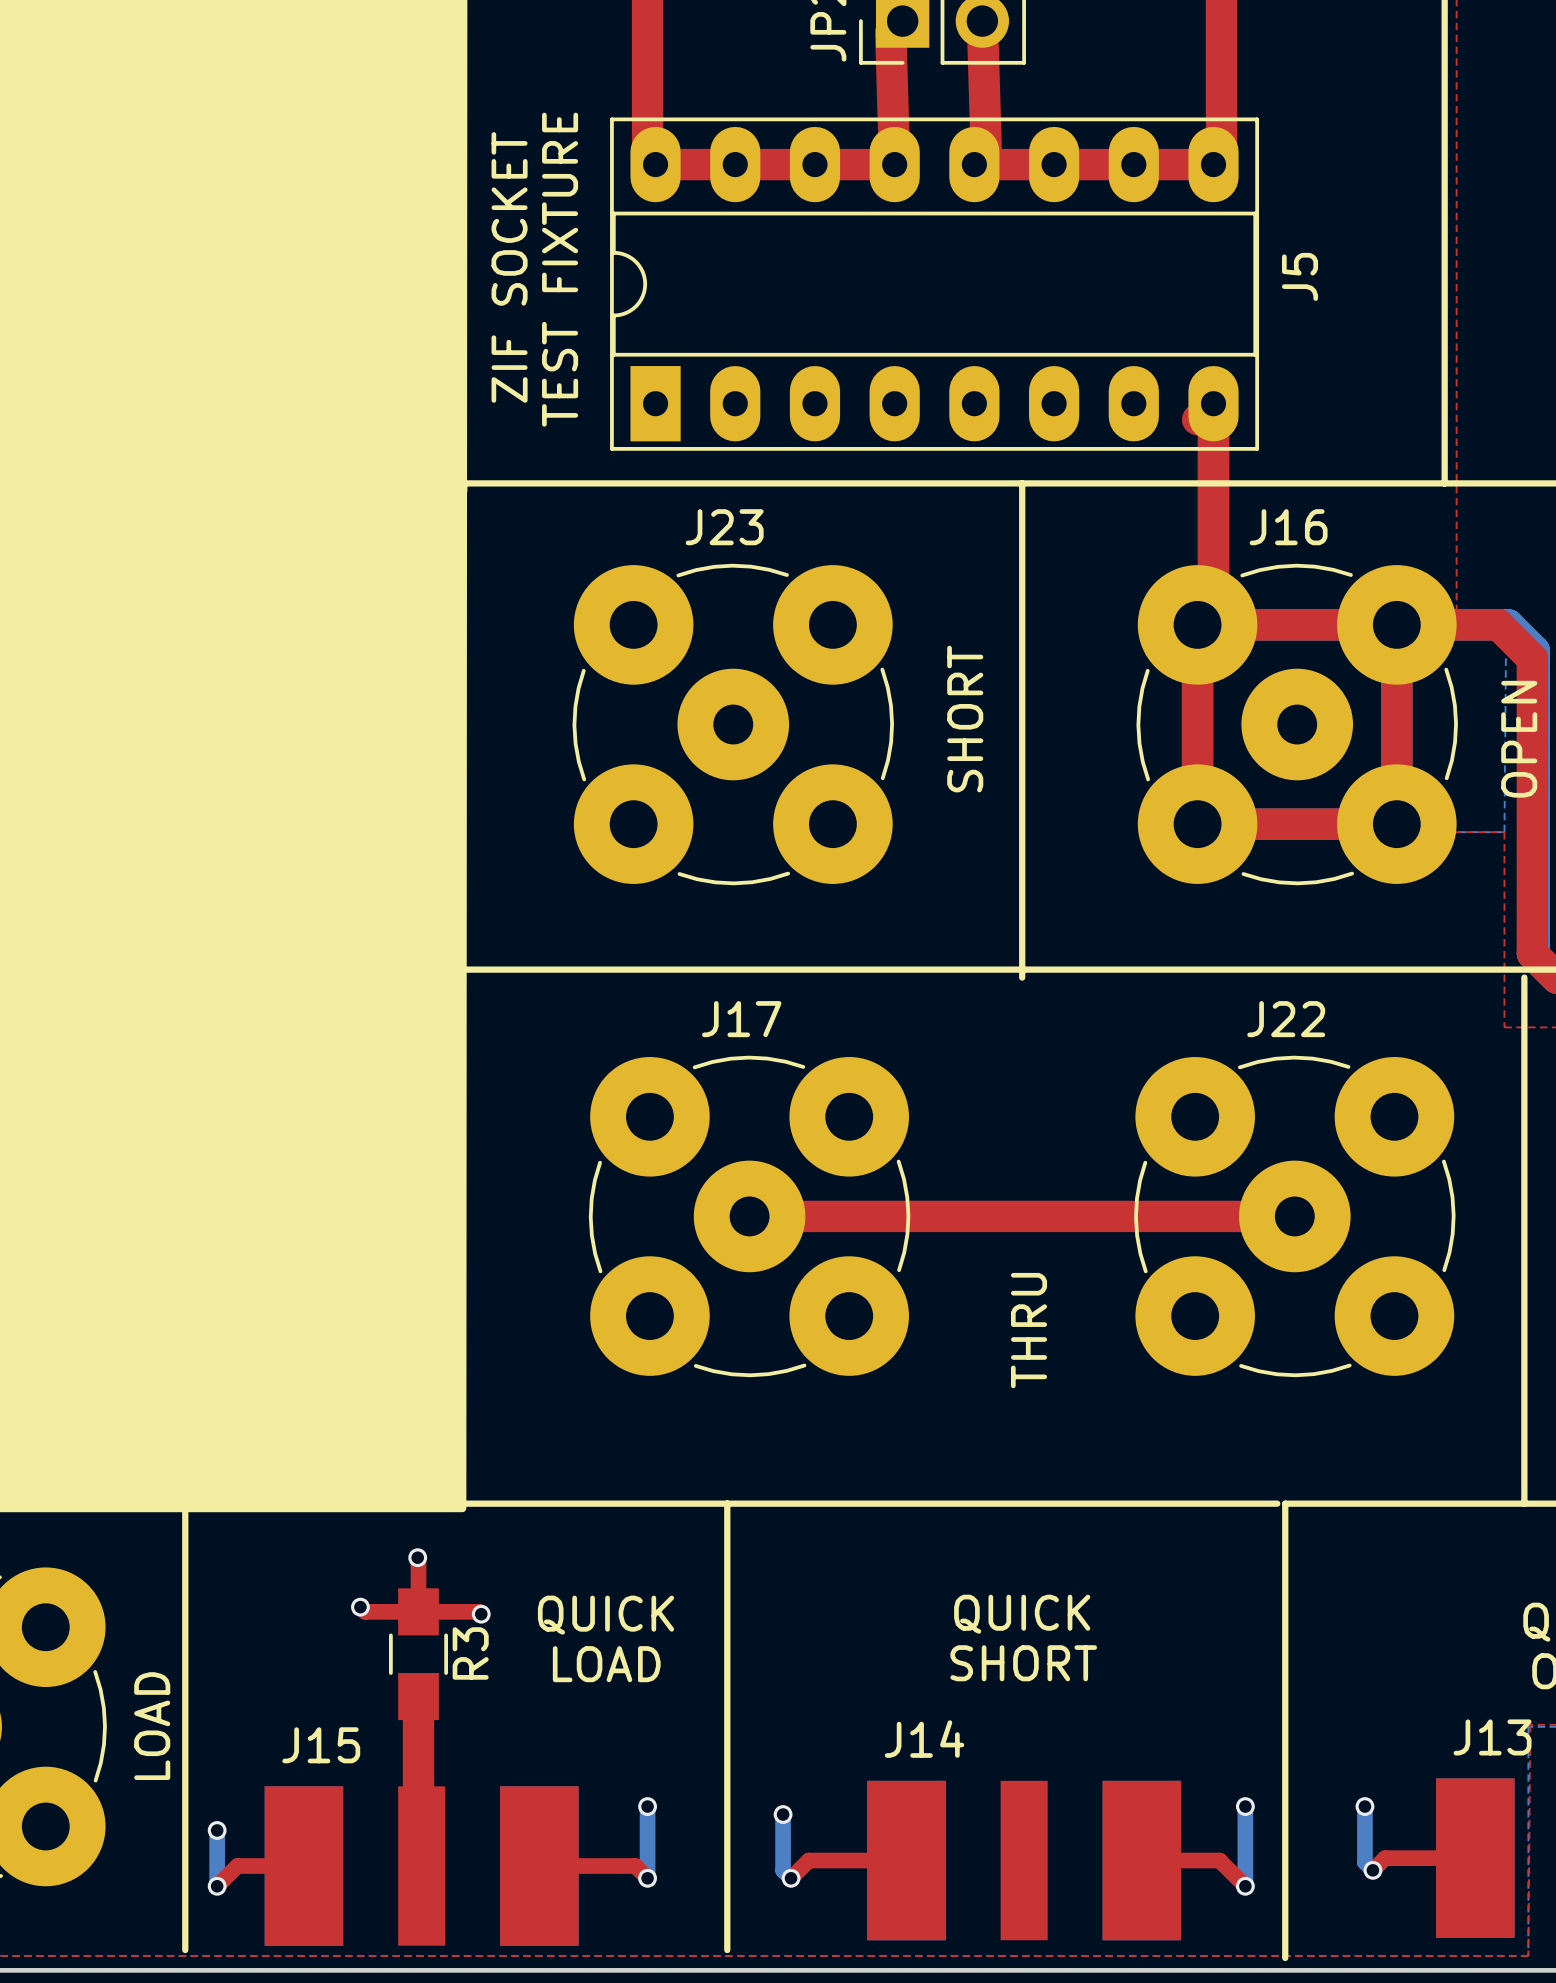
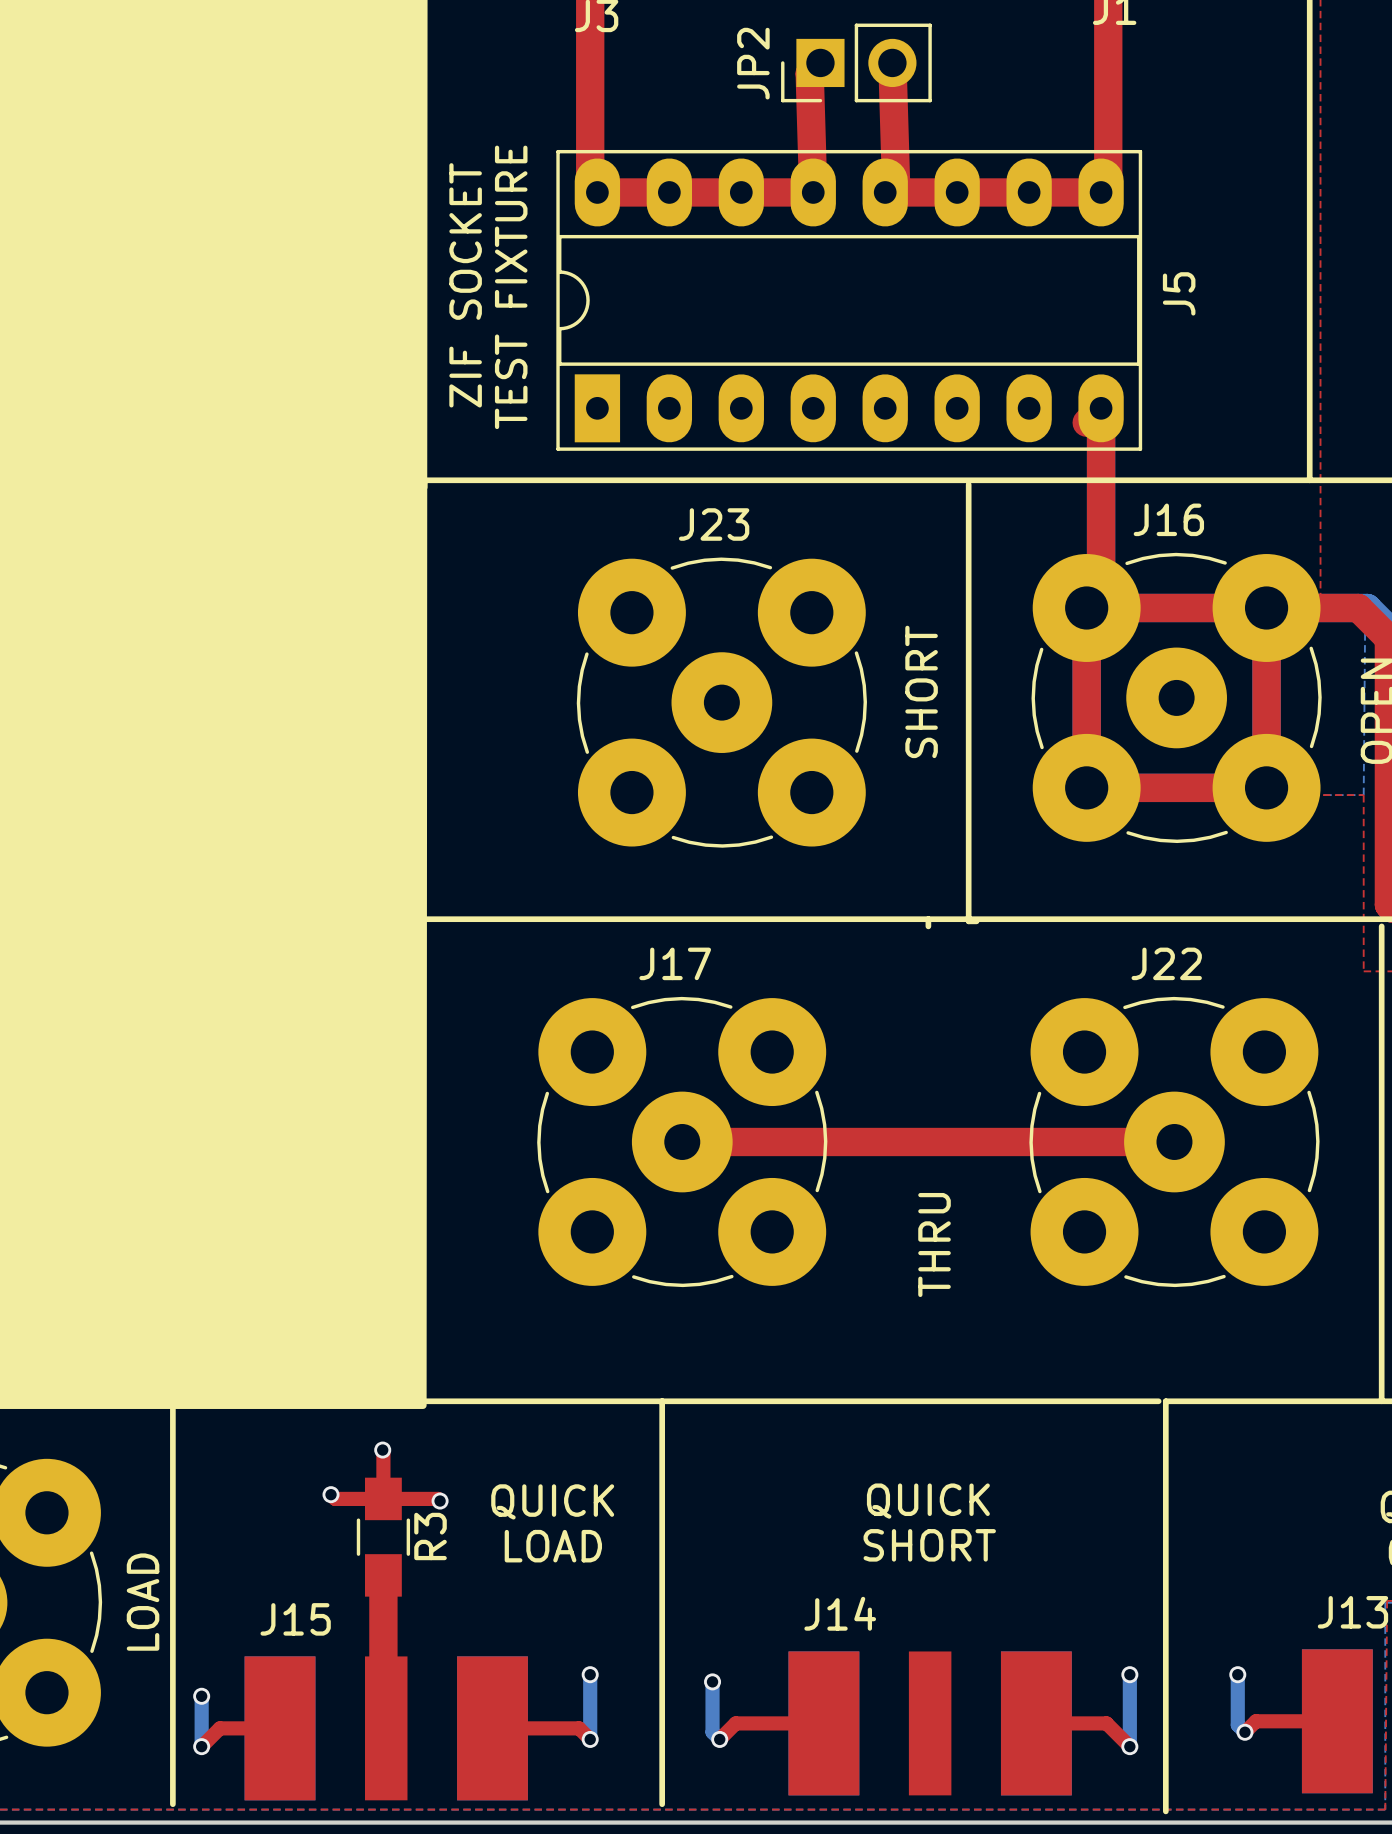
line: (1022, 483) (1022, 969) -> none
line: none -> (968, 484) (968, 921) (976, 921)
text position: SHORT (965, 719) -> SHORT (921, 691)
J23 position: (733, 724) -> (721, 702)

